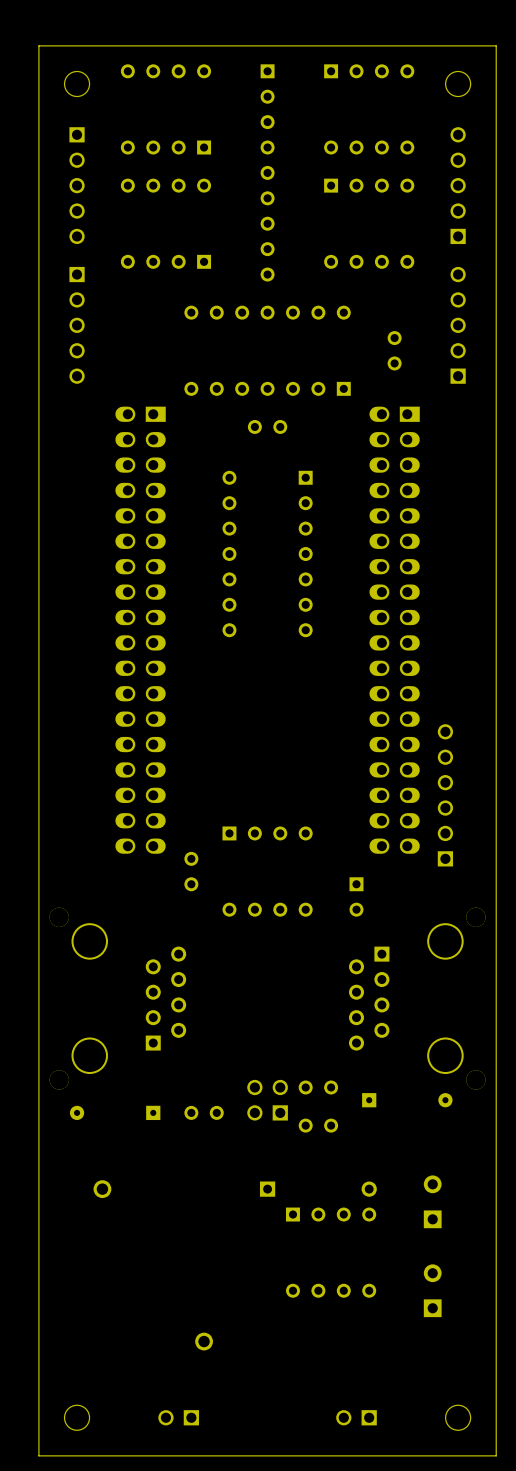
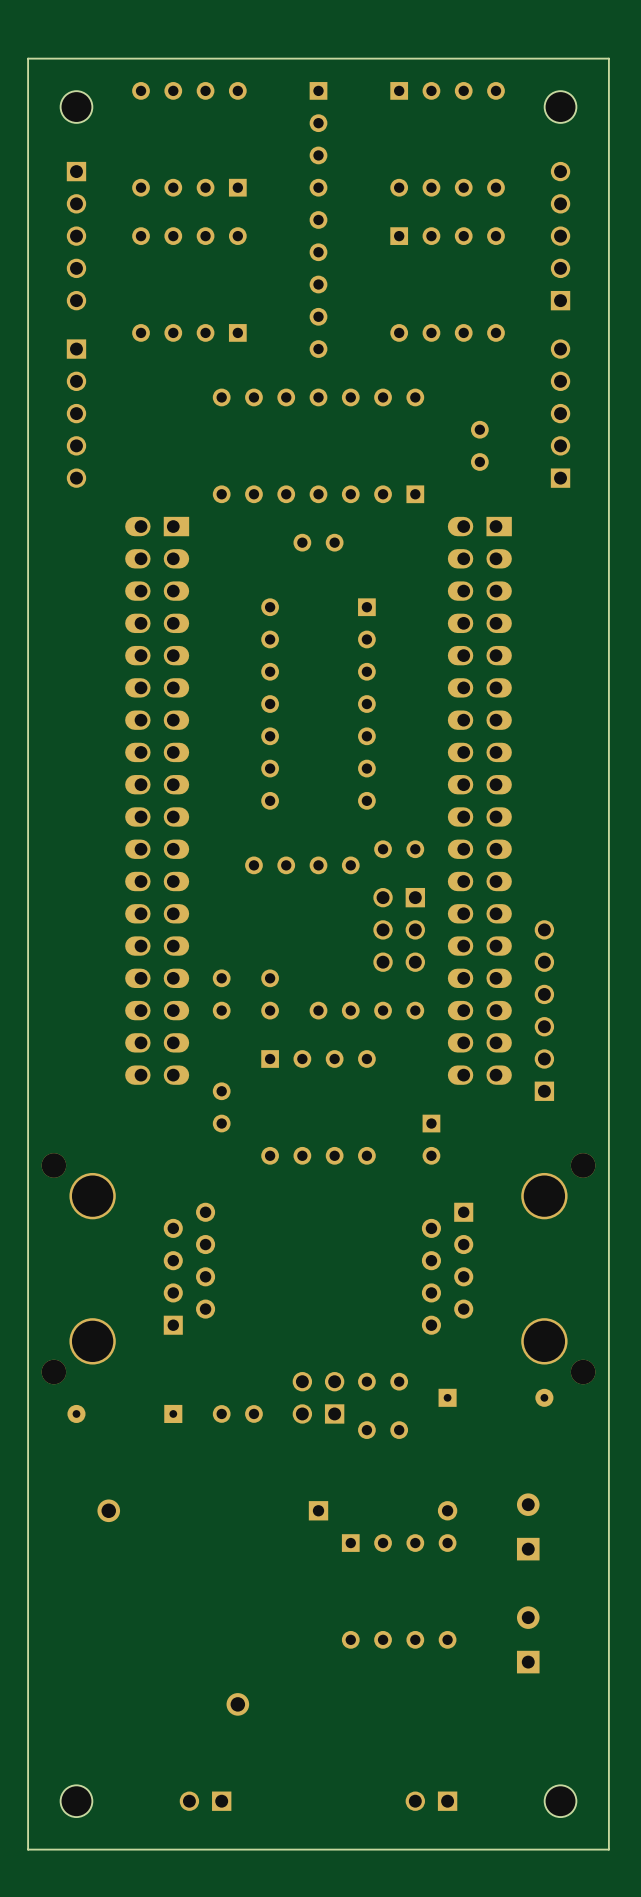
part: none -> (399, 849)
part: none -> (270, 865)
part: none -> (334, 865)
part: none -> (399, 929)
part: none -> (221, 994)
part: none -> (270, 994)
part: none -> (334, 1010)
part: none -> (399, 1010)

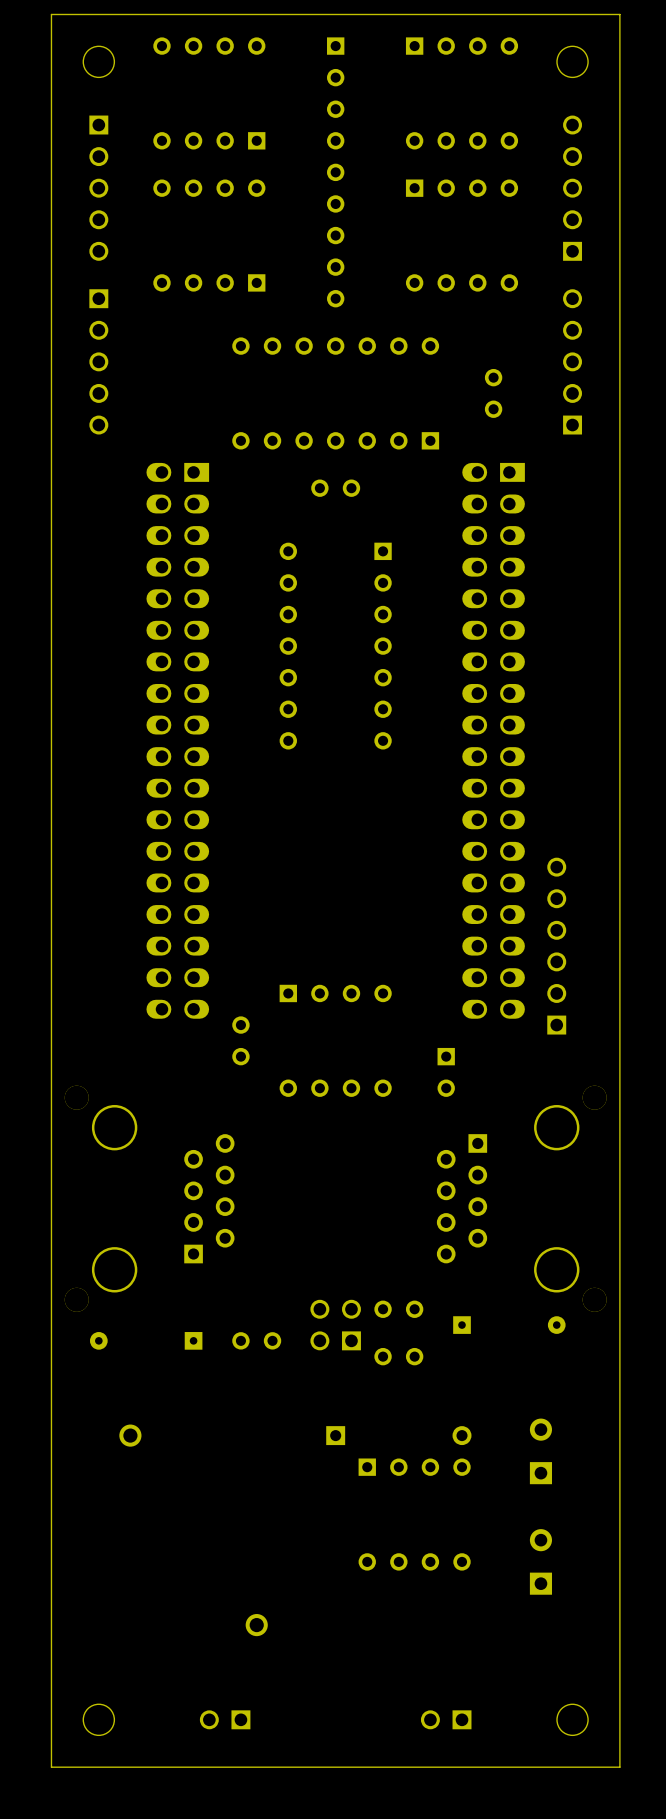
part: (399, 849) -> none
part: (270, 865) -> none
part: (334, 865) -> none
part: (399, 929) -> none
part: (221, 994) -> none
part: (270, 994) -> none
part: (334, 1010) -> none
part: (399, 1010) -> none

